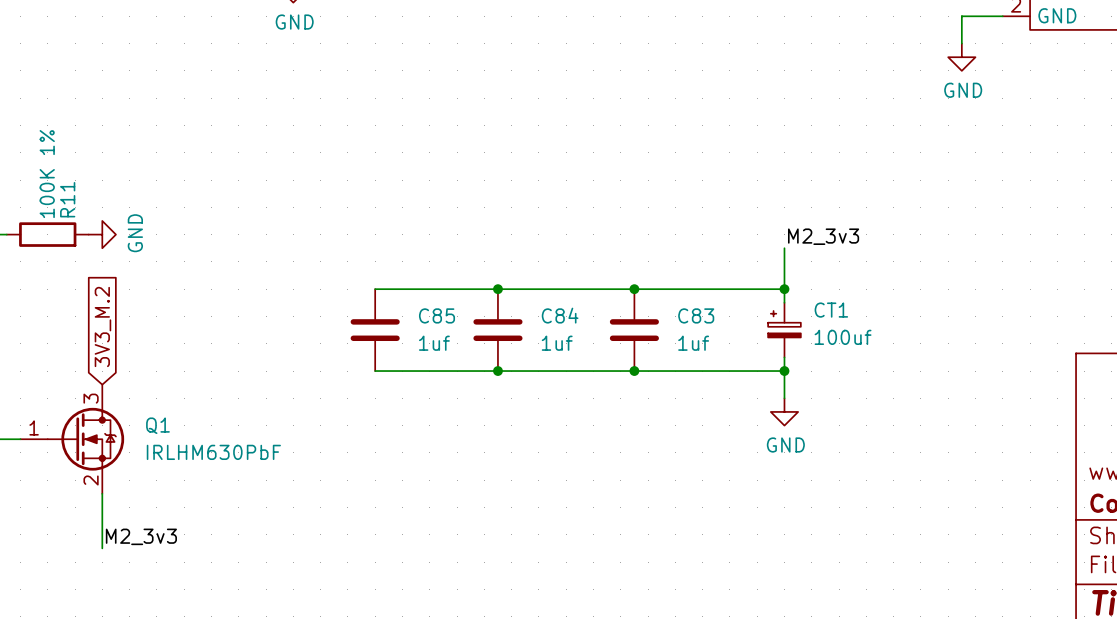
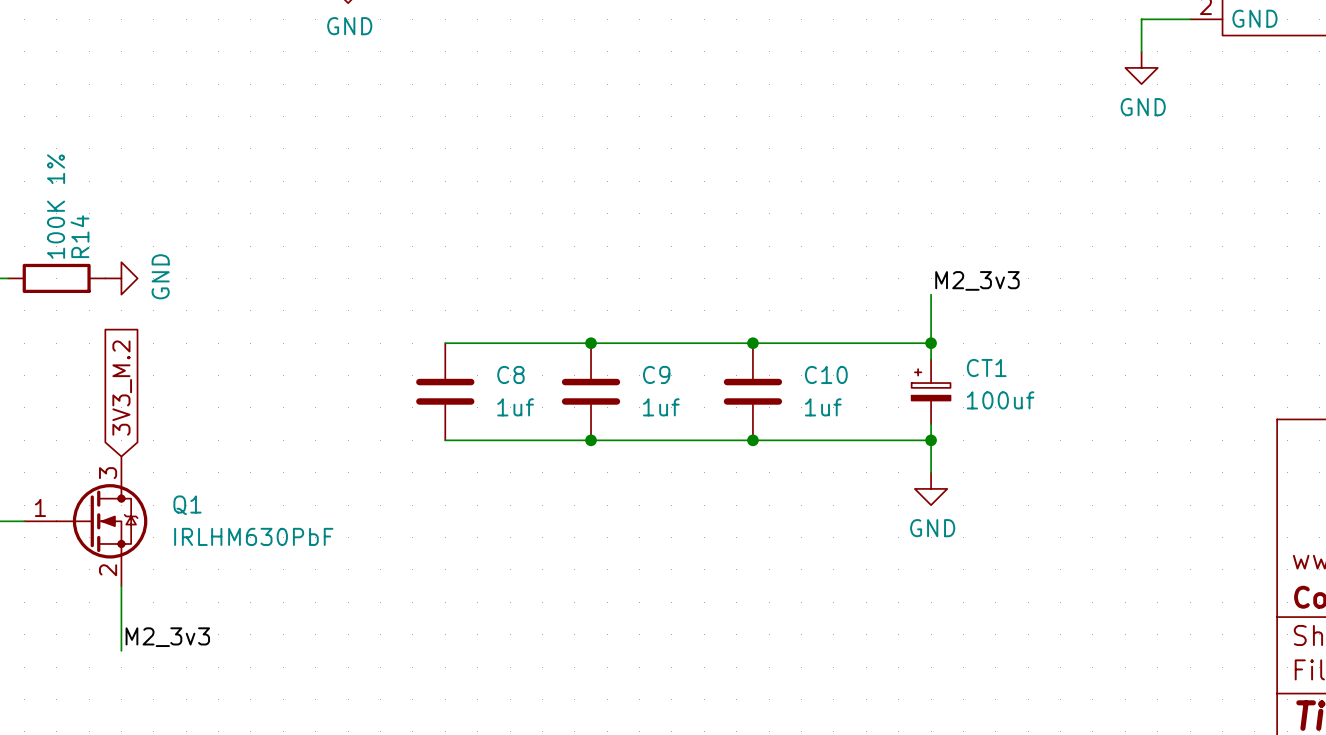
R11 name: R11 (67, 199) -> R14 (79, 236)
C85 name: C85 (437, 315) -> C8 (510, 374)
C84 name: C84 (560, 315) -> C9 (656, 374)
C83 name: C83 (696, 315) -> C10 (826, 374)

